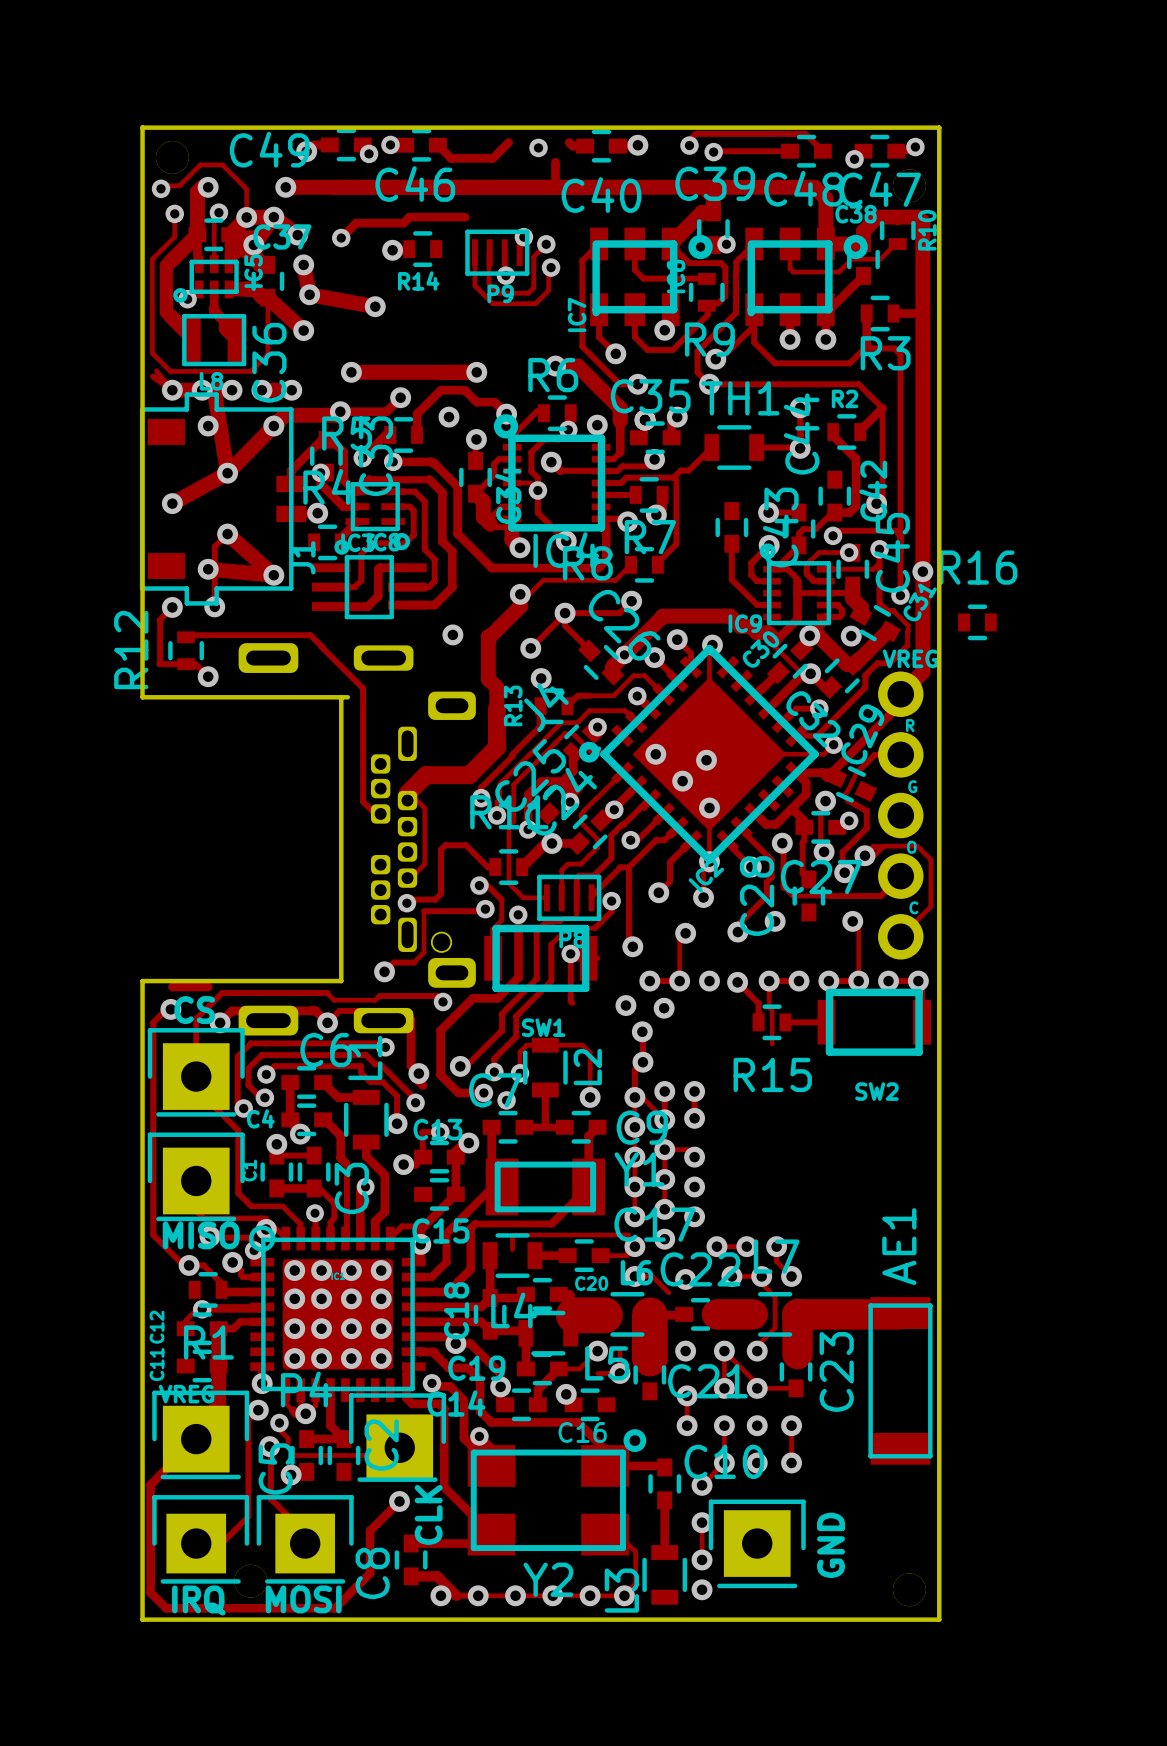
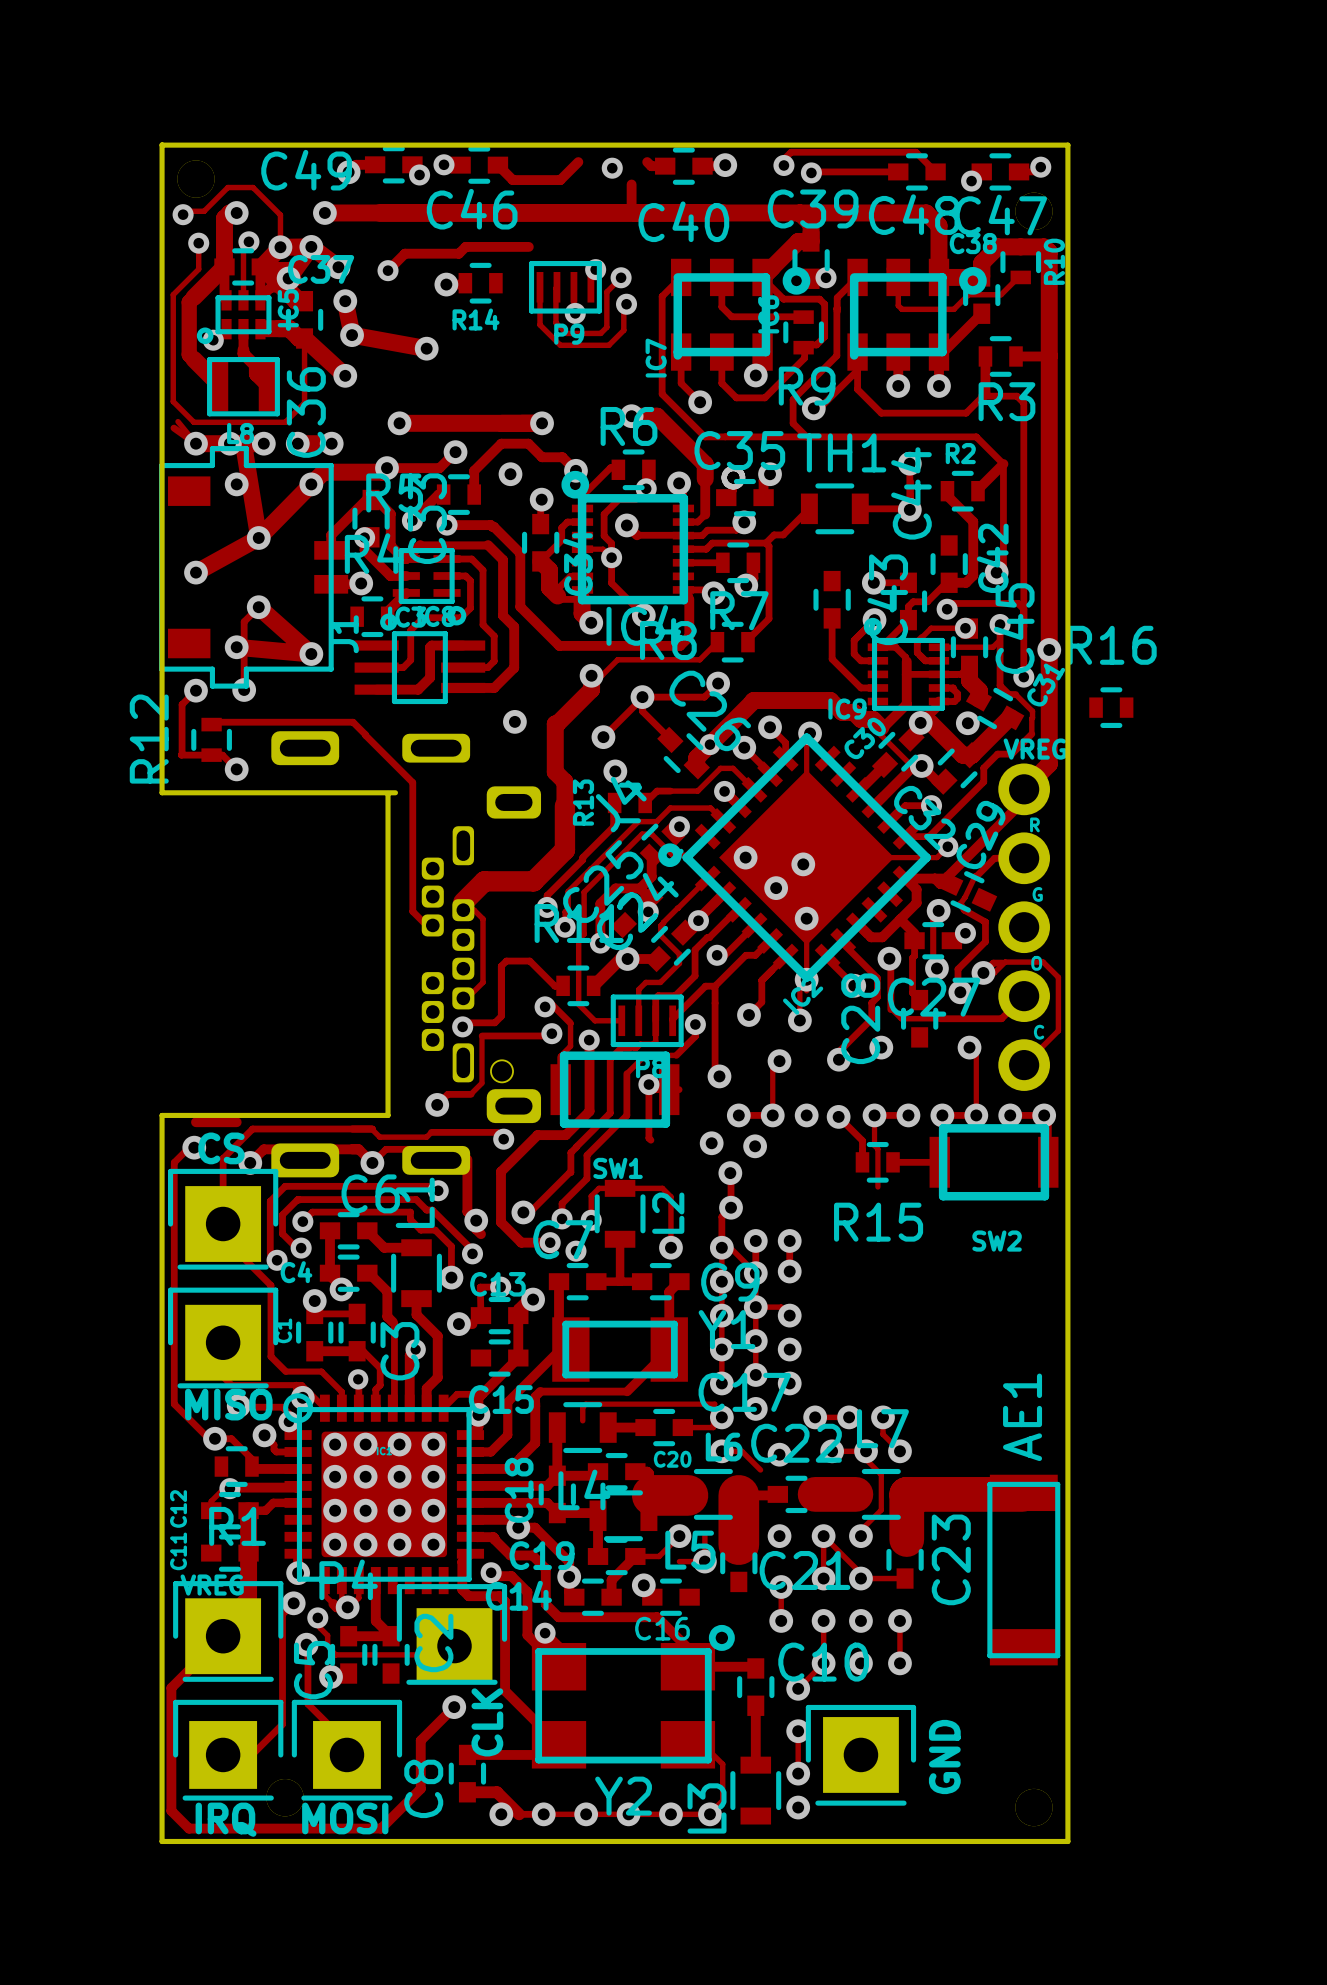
track: none -> (725, 436) (806, 436)
via: (637, 384) -> none
via: (709, 384) -> none

